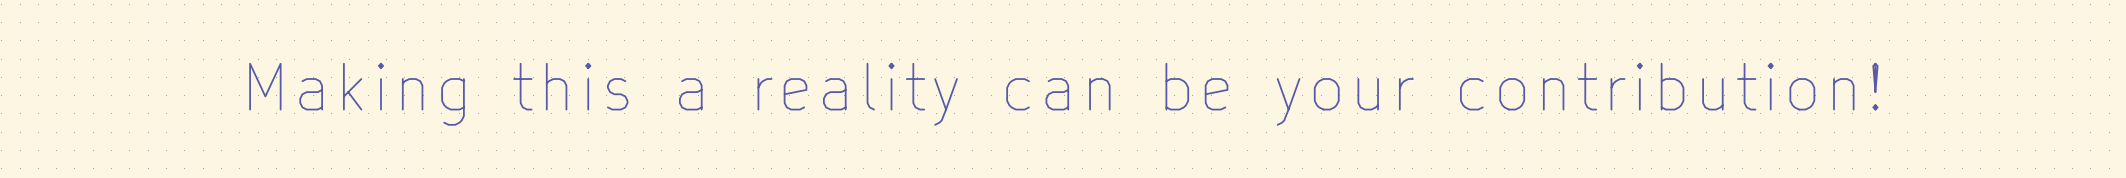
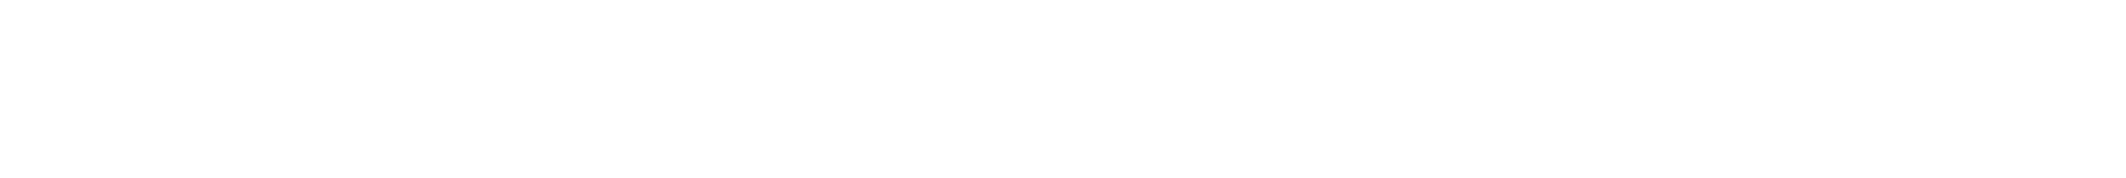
text: Making this a reality can be your contribution! (1063, 94) -> none

